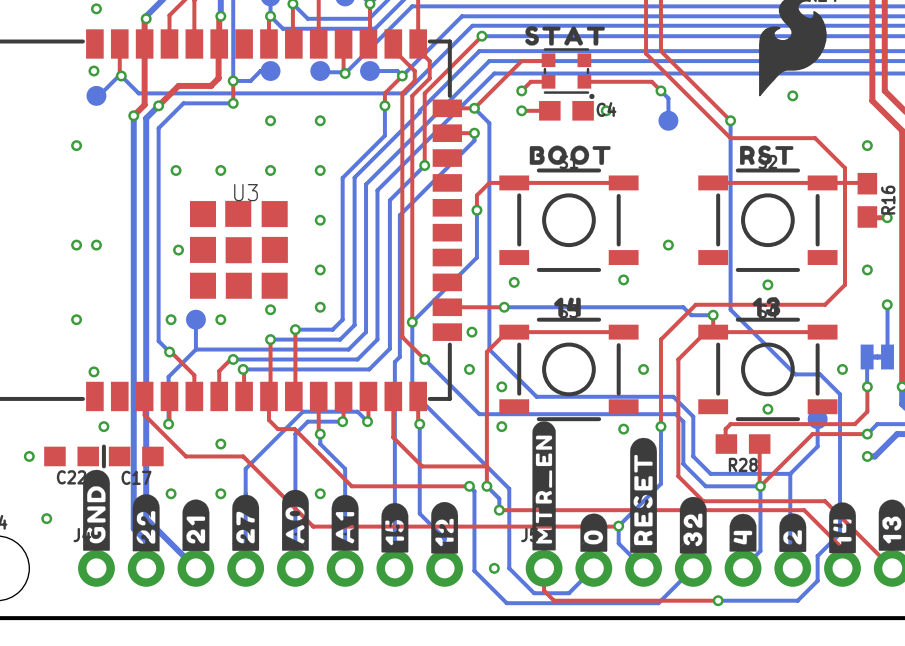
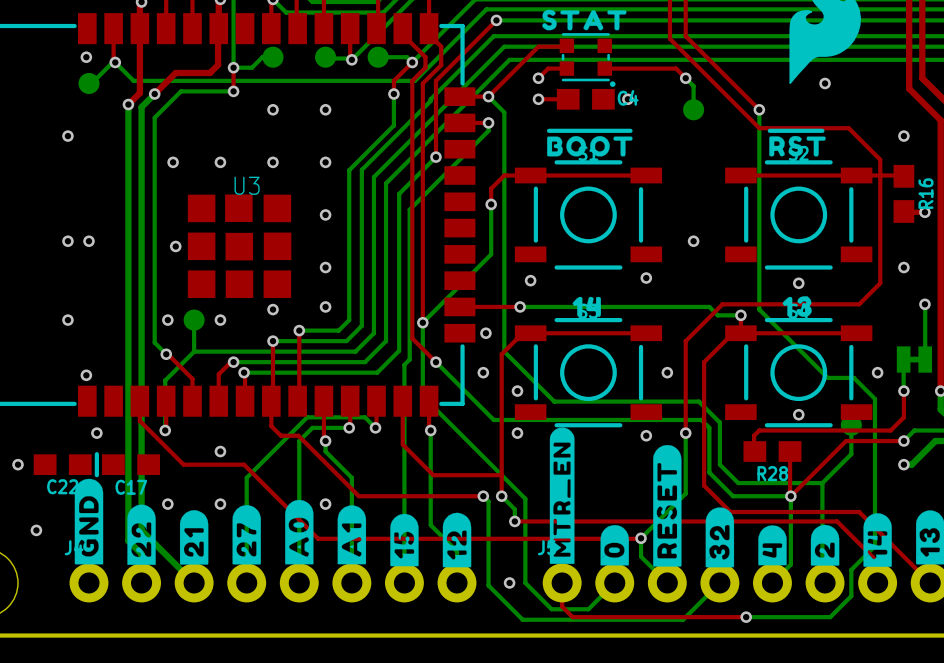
line: none -> (549, 130) (630, 130)
line: none -> (769, 130) (822, 130)

